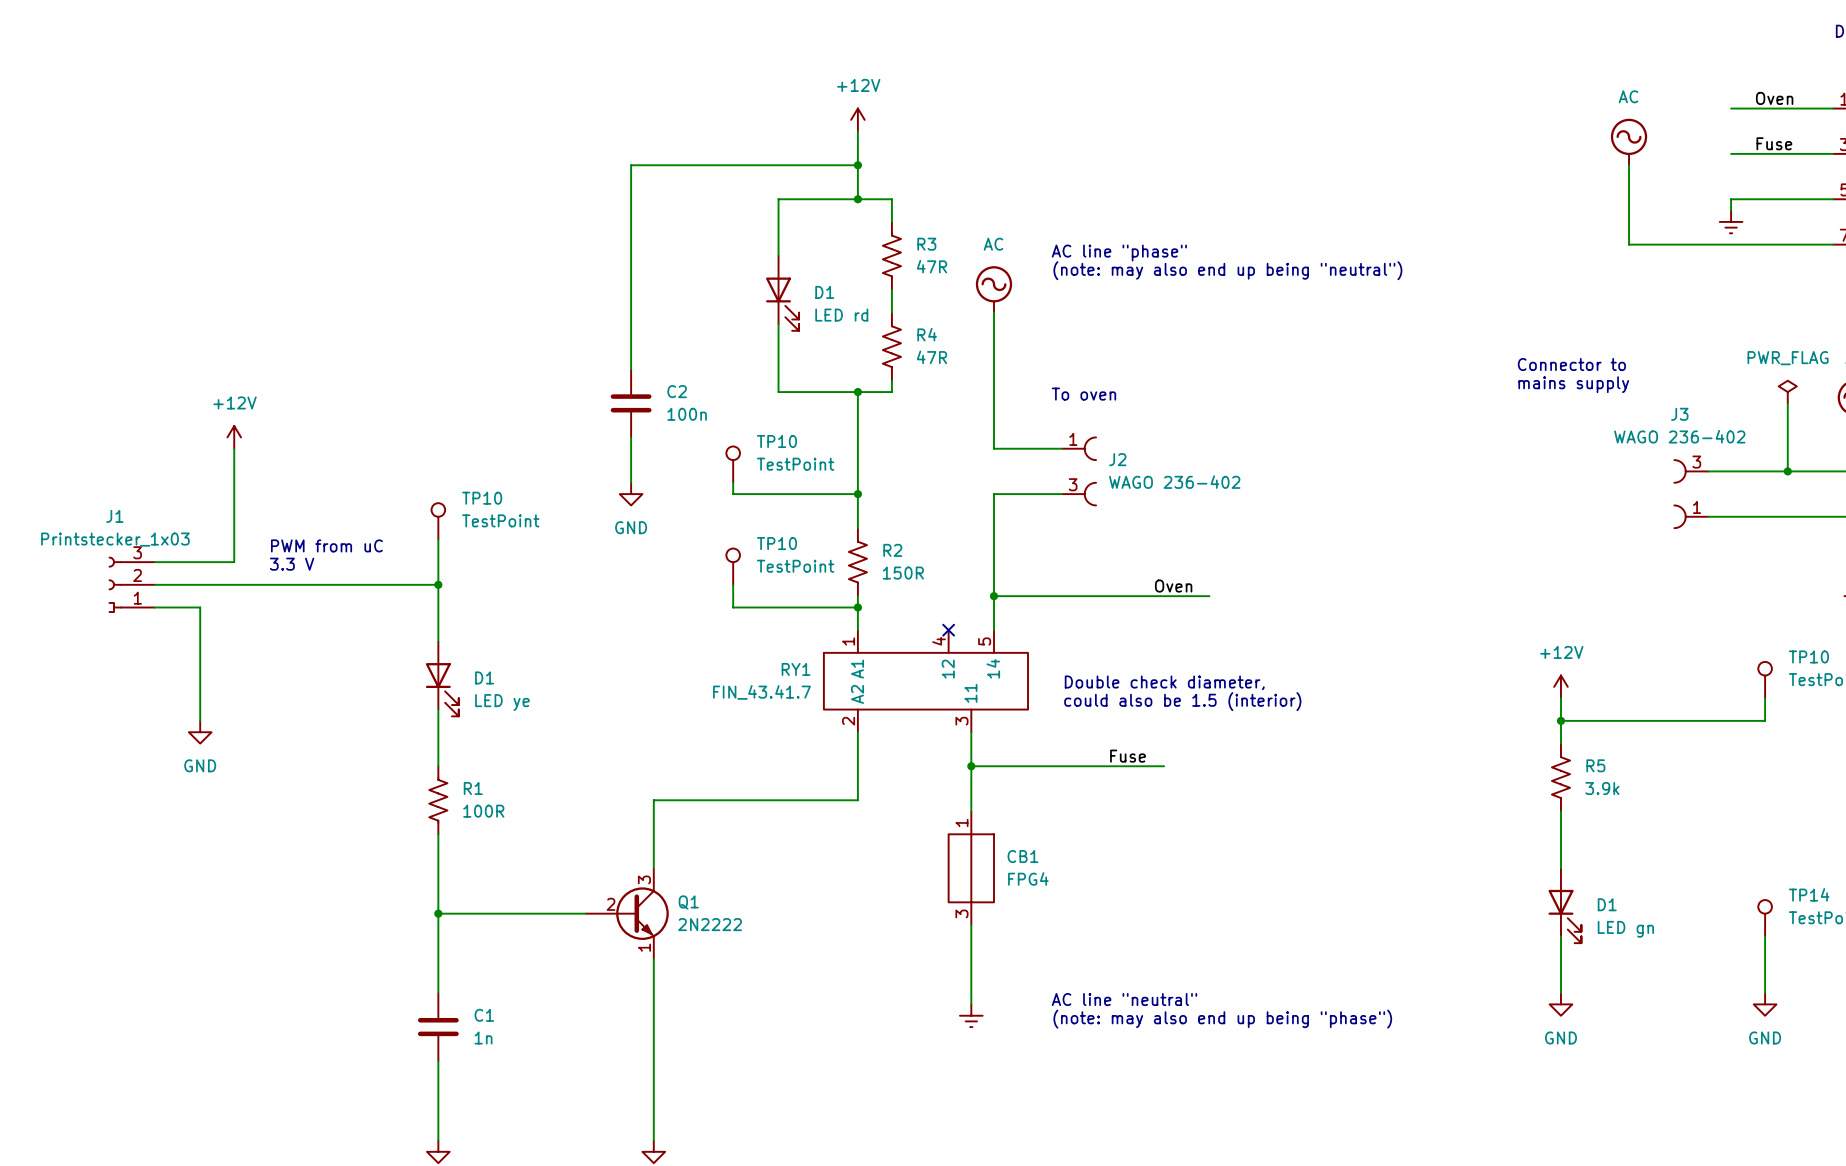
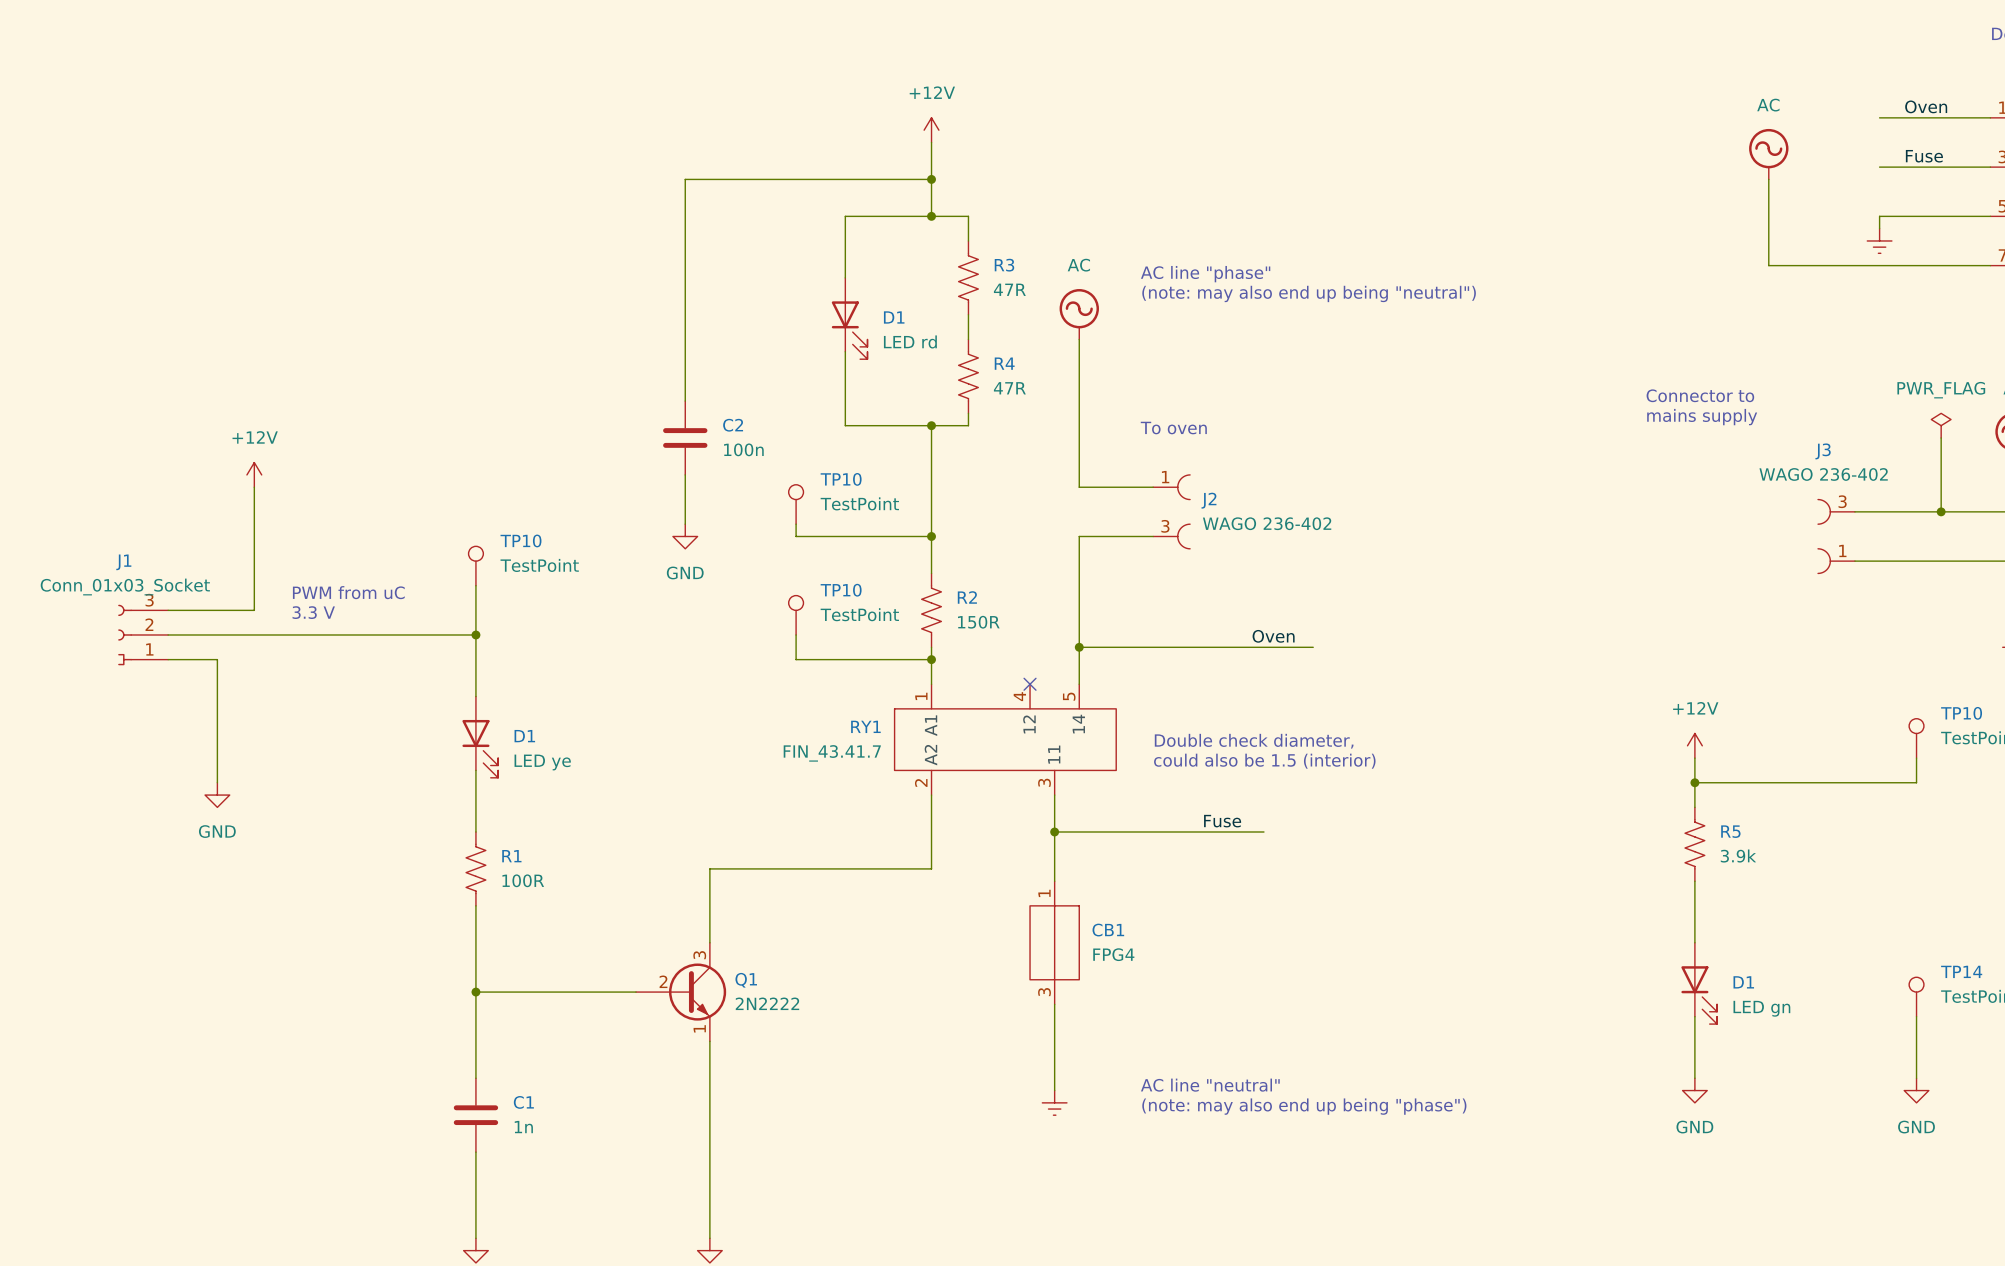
J1 value: Printstecker_1x03 (115, 539) -> Conn_01x03_Socket (125, 587)

